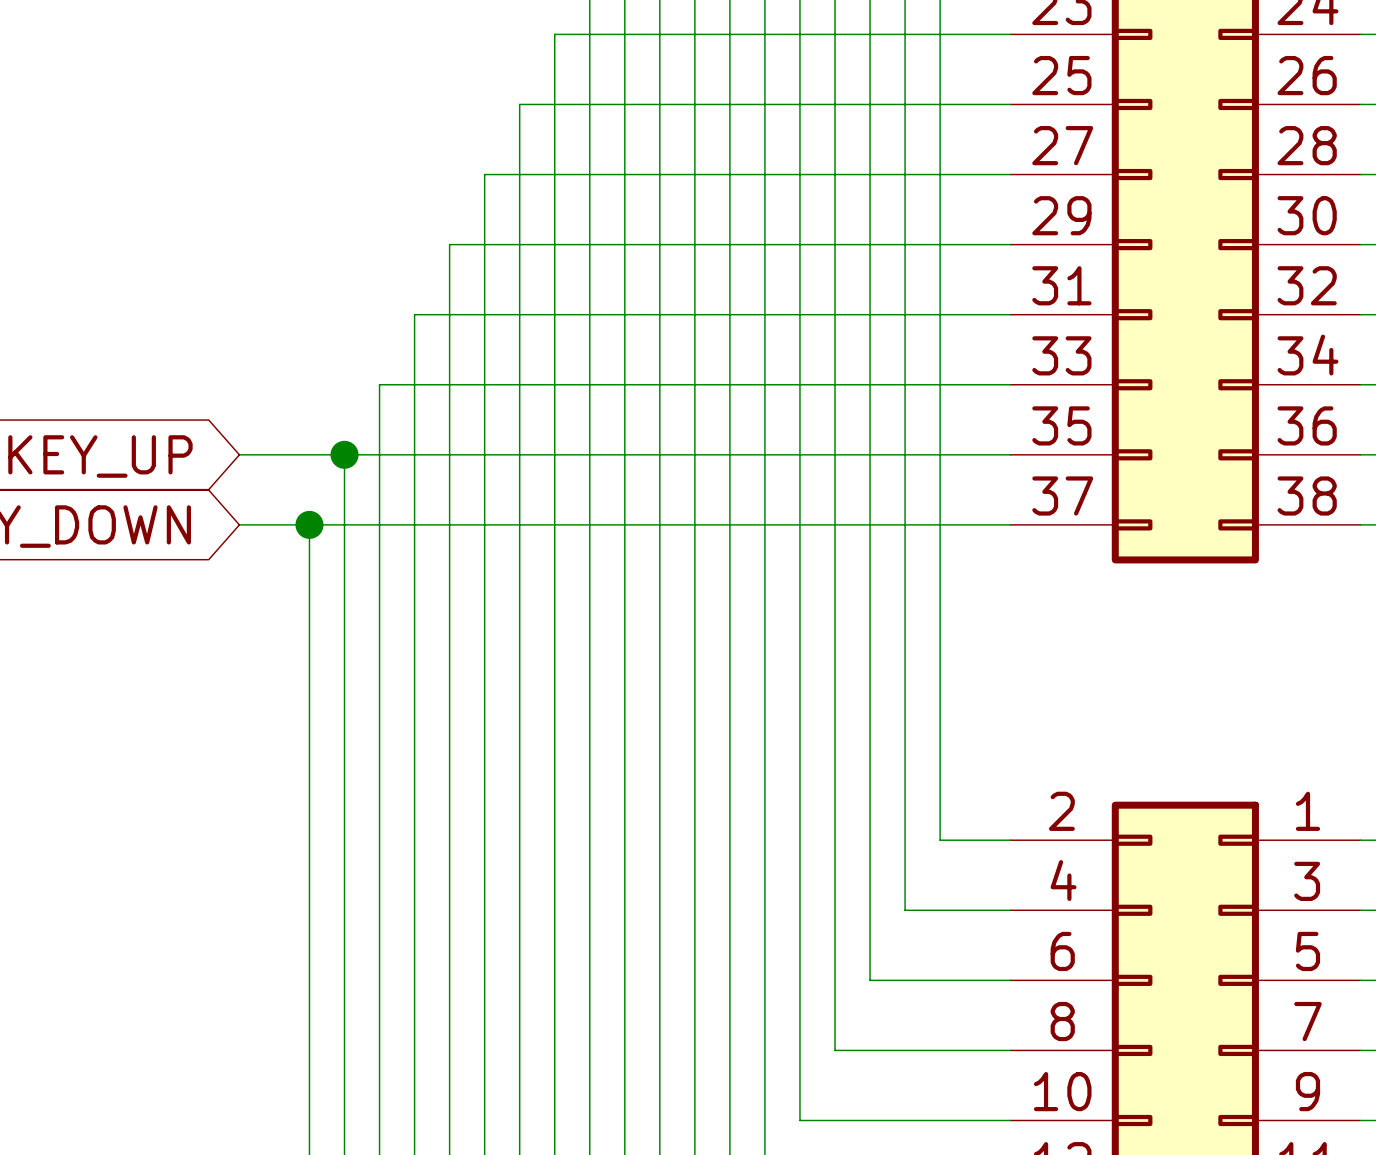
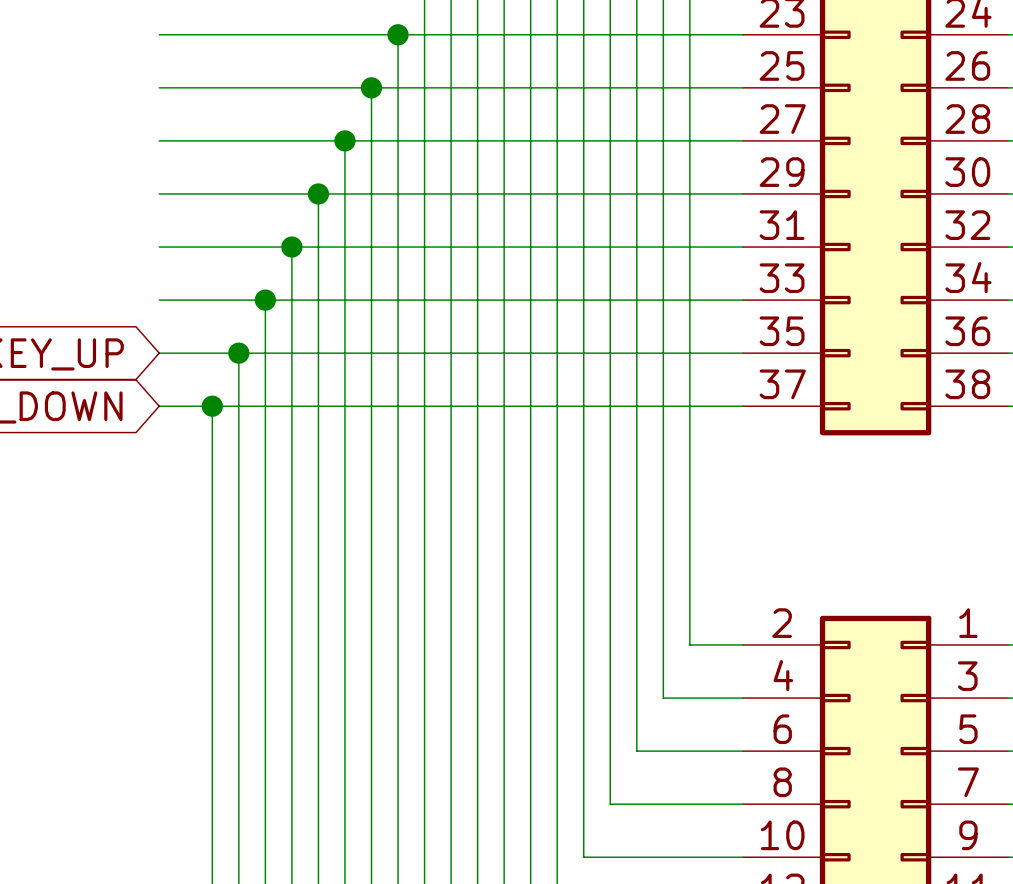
wire: none -> (159, 34) (398, 34)
junction: none -> (398, 34)
wire: none -> (159, 87) (371, 87)
junction: none -> (371, 87)
wire: none -> (159, 140) (344, 140)
junction: none -> (344, 140)
wire: none -> (159, 193) (318, 193)
junction: none -> (318, 193)
wire: none -> (159, 247) (291, 247)
junction: none -> (291, 247)
wire: none -> (159, 300) (265, 300)
junction: none -> (265, 300)

